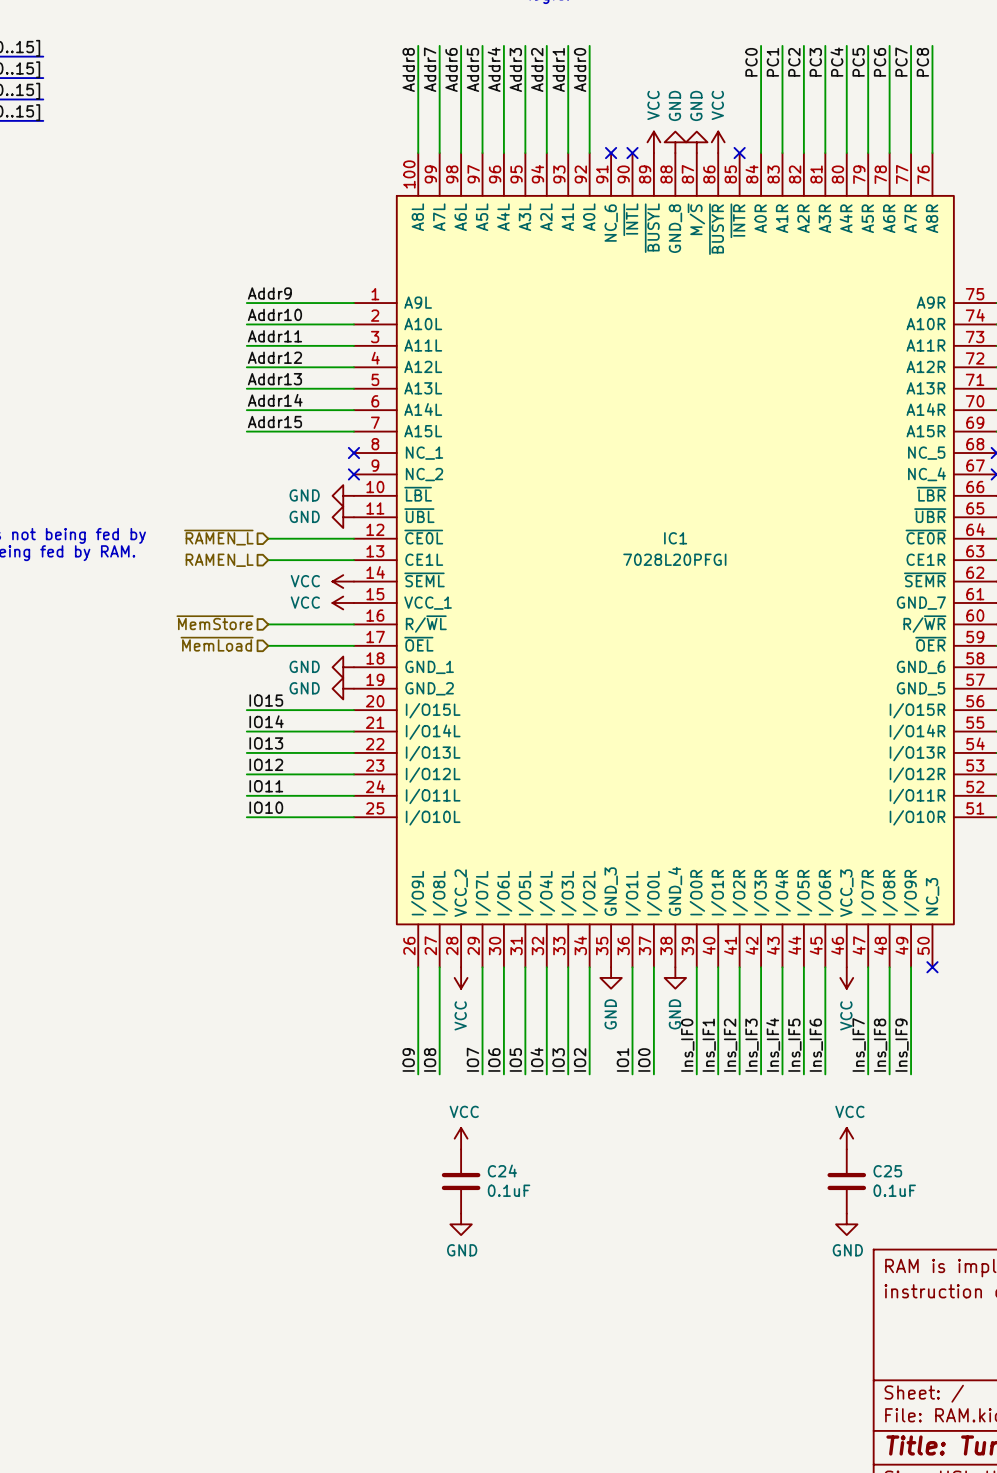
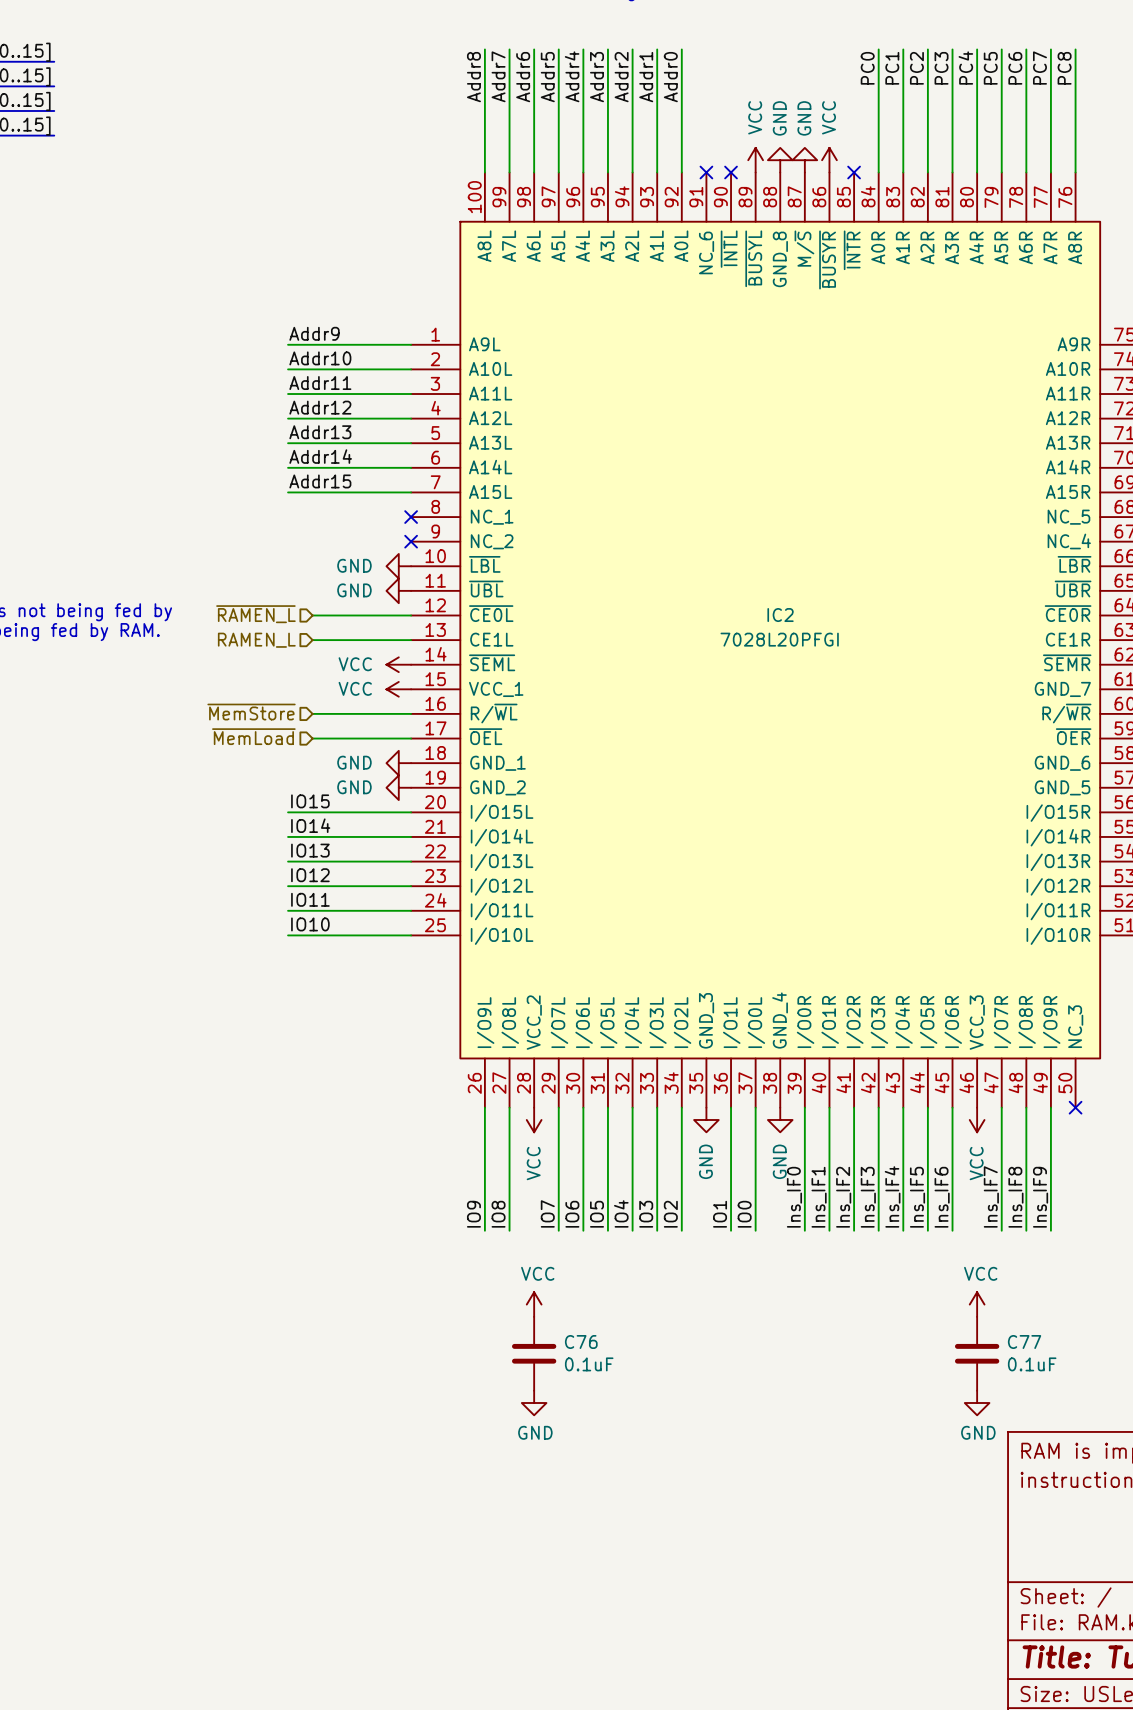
IC1 name: IC1 (675, 538) -> IC2 (780, 615)
C24 name: C24 (502, 1170) -> C76 (581, 1342)
C25 name: C25 (887, 1171) -> C77 (1024, 1342)

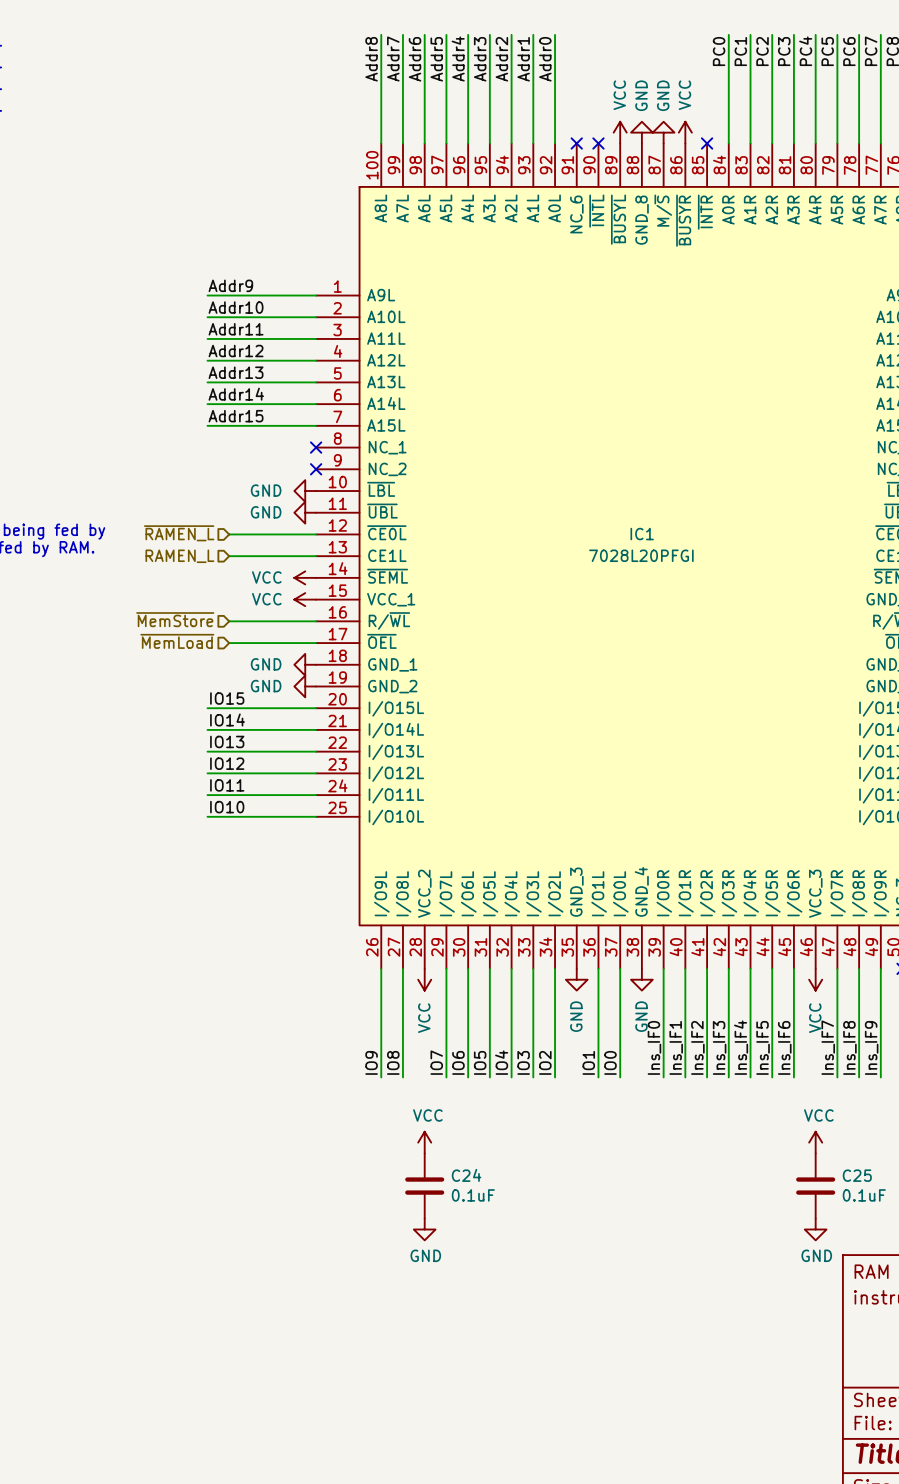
IC2 name: IC2 (780, 615) -> IC1 (642, 534)
C76 name: C76 (581, 1342) -> C24 (466, 1175)
C77 name: C77 (1024, 1342) -> C25 (857, 1175)

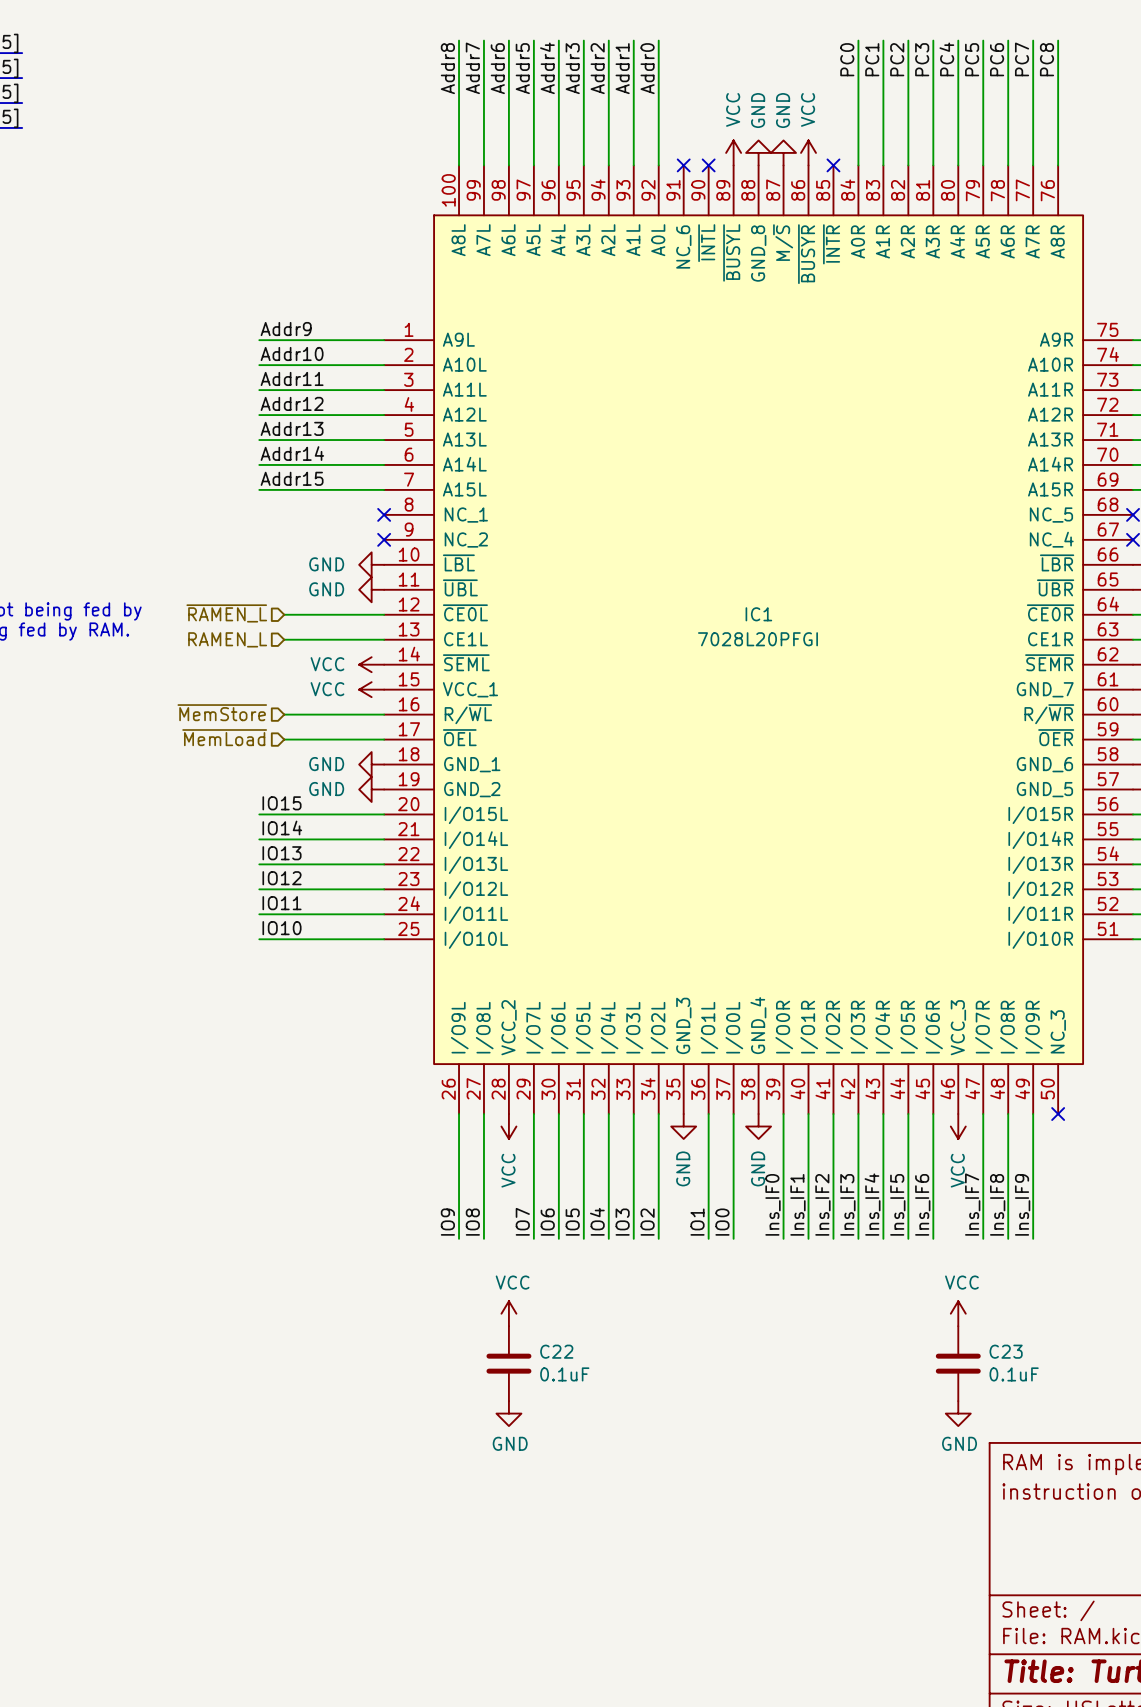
C24 name: C24 (466, 1175) -> C22 (556, 1351)
C25 name: C25 (857, 1175) -> C23 (1006, 1351)

